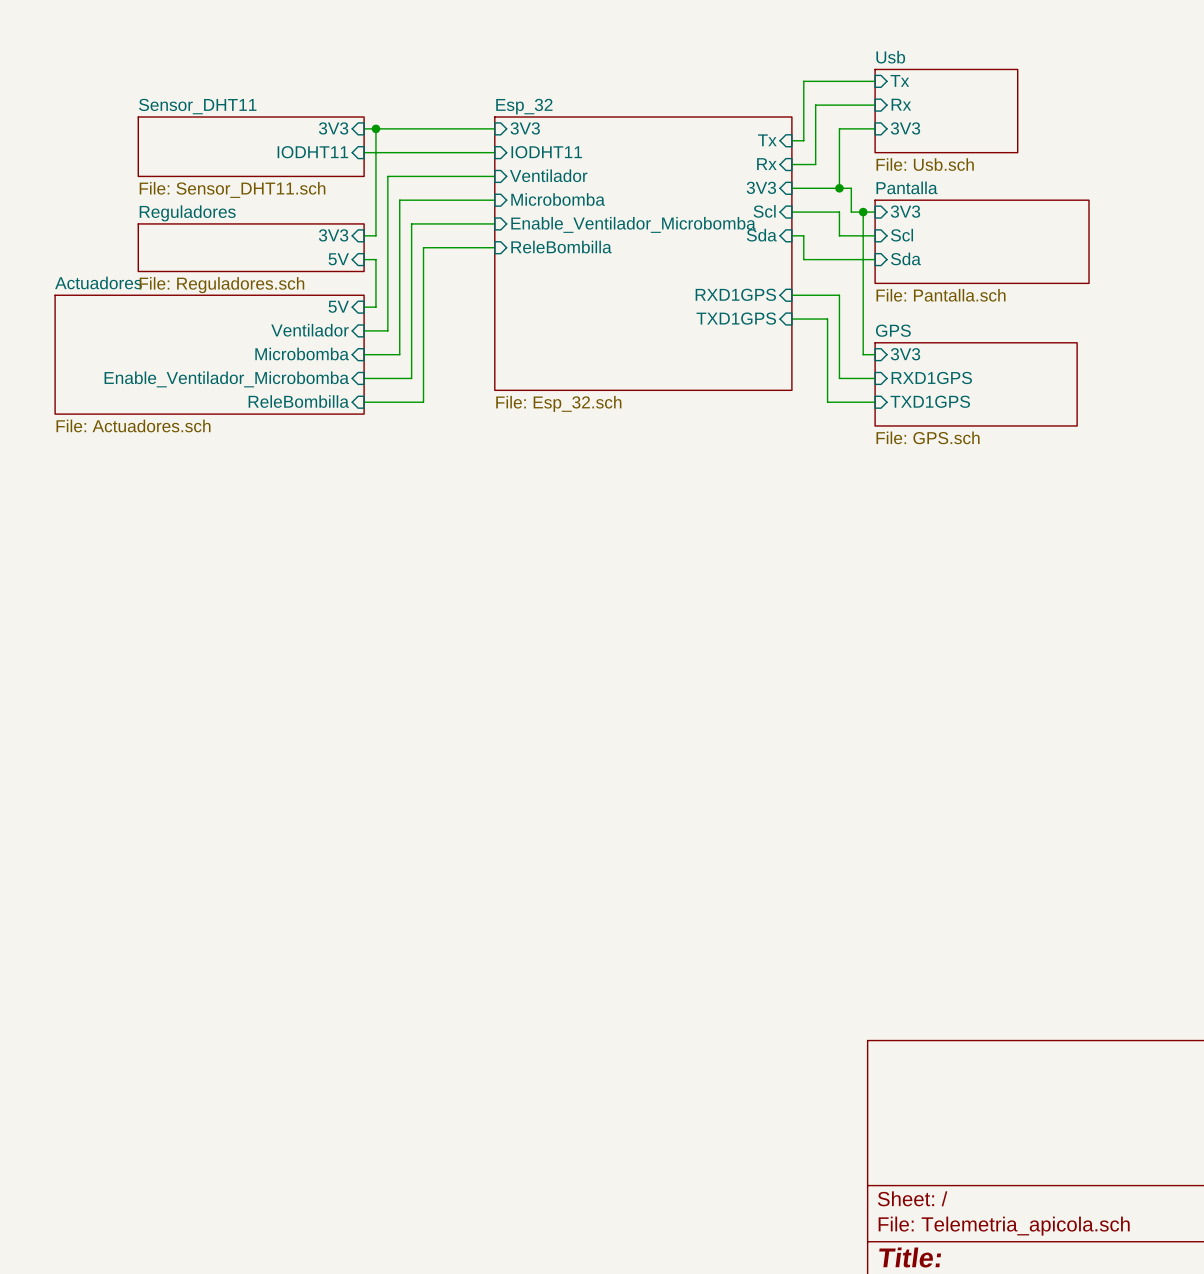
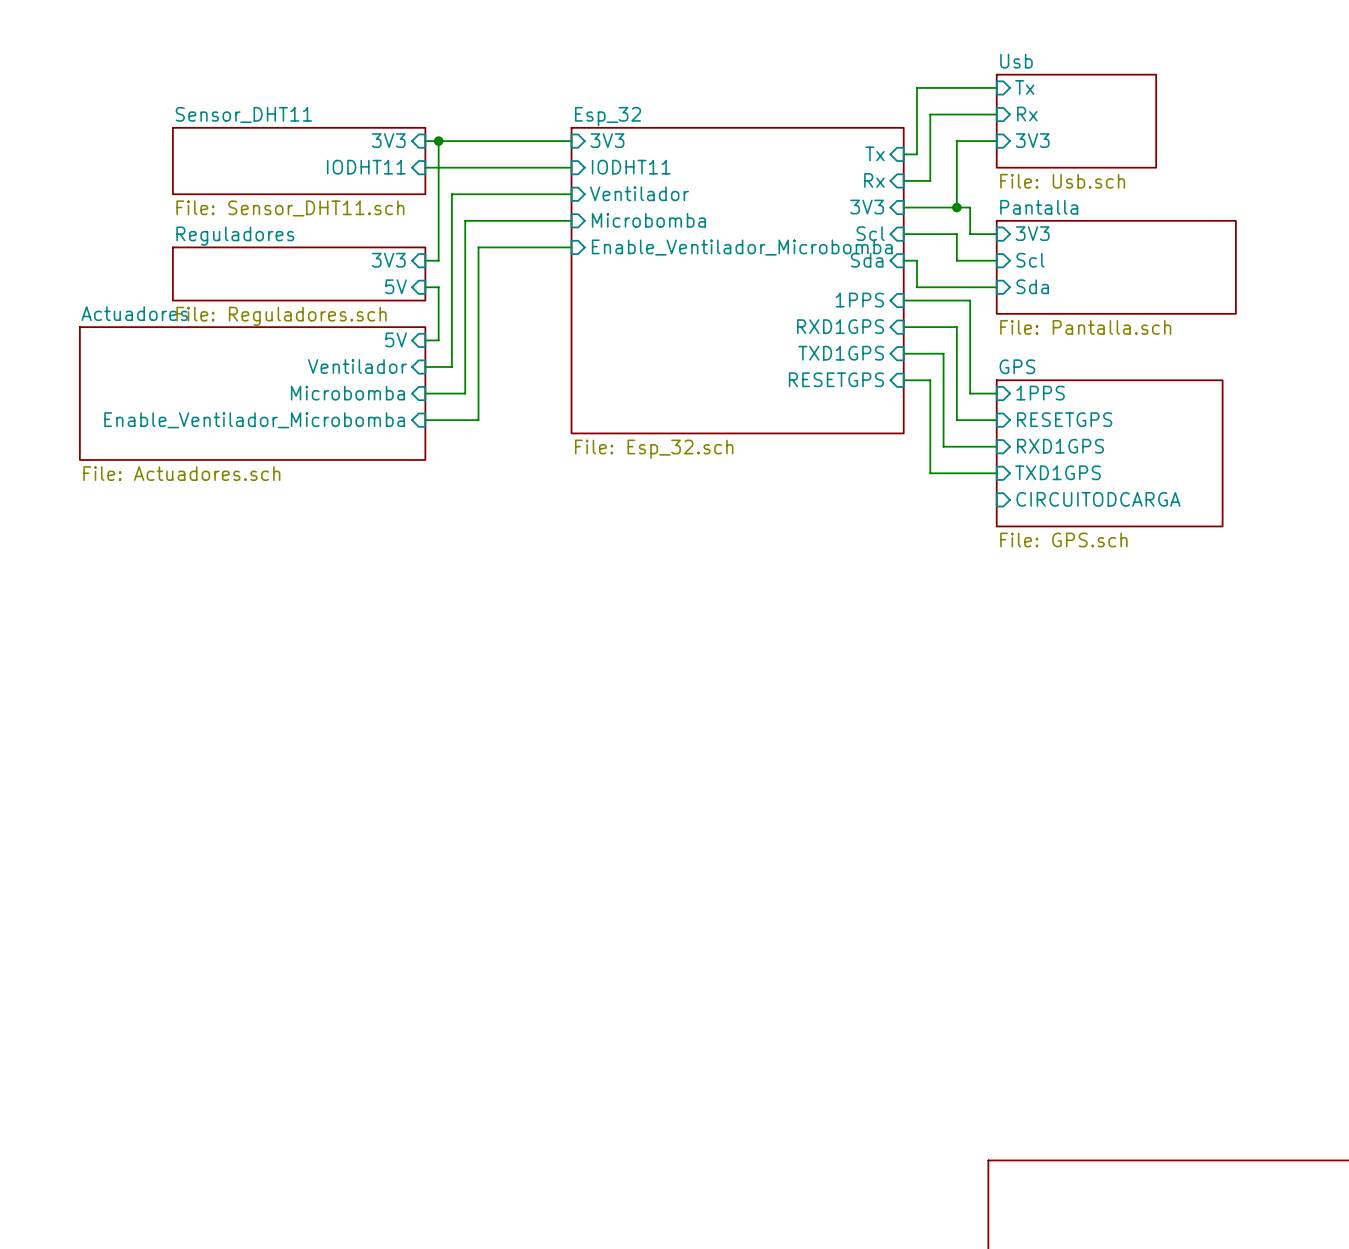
wire: (863, 212) (863, 354) -> (903, 300) (970, 300) (970, 393) (983, 393)
junction: (863, 212) -> none
wire: (494, 247) (423, 247) (423, 402) (364, 402) -> none
sheet pin: ReleBombilla (561, 247) -> none
sheet pin: none -> 1PPS (859, 300)
sheet pin: none -> RESETGPS (836, 379)
wire: none -> (903, 380) (930, 380) (930, 473) (996, 473)
sheet pin: 3V3 (905, 354) -> 1PPS (1040, 393)
sheet pin: RXD1GPS (931, 377) -> RESETGPS (1064, 419)
sheet GPS: File: GPS.sch (976, 384) -> none
sheet pin: ReleBombilla (298, 401) -> none
sheet pin: TXD1GPS (930, 401) -> RXD1GPS (1060, 446)
sheet GPS: none -> File: GPS.sch (1109, 453)
sheet pin: none -> TXD1GPS (1057, 472)
sheet pin: none -> CIRCUITODCARGA (1098, 499)

